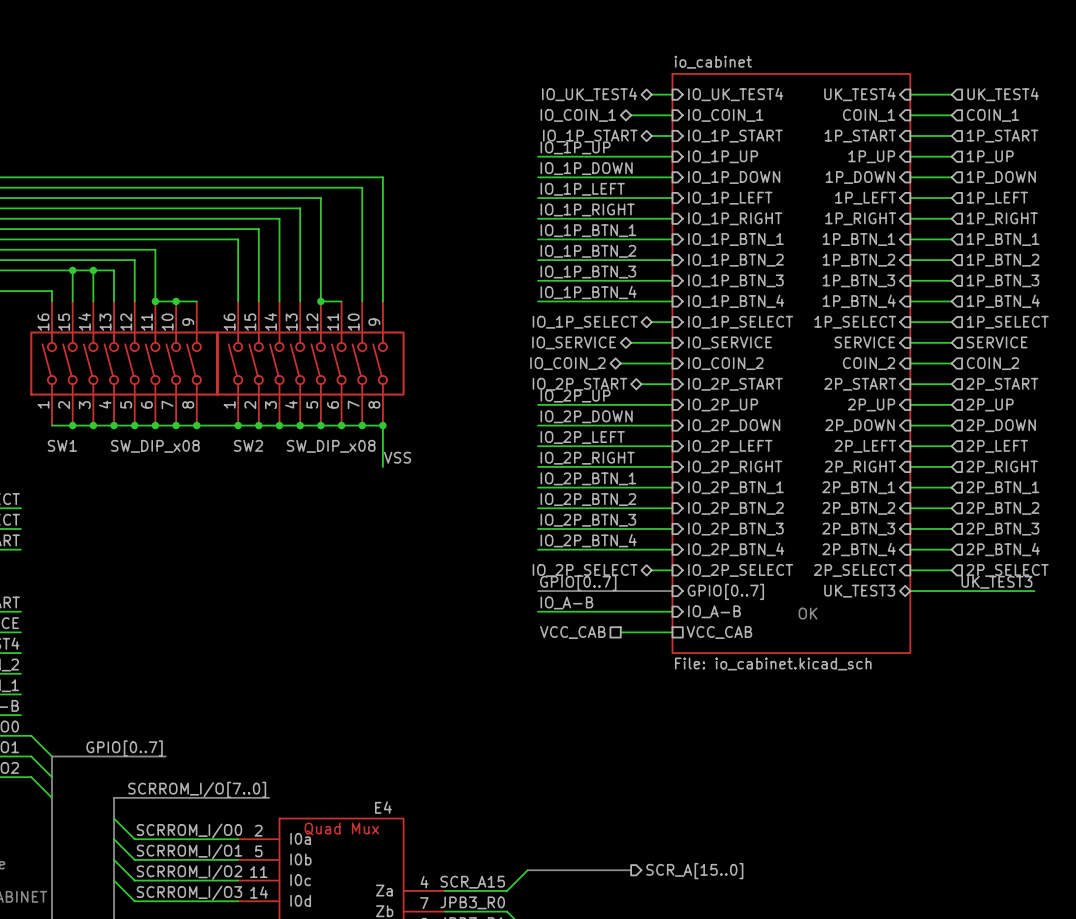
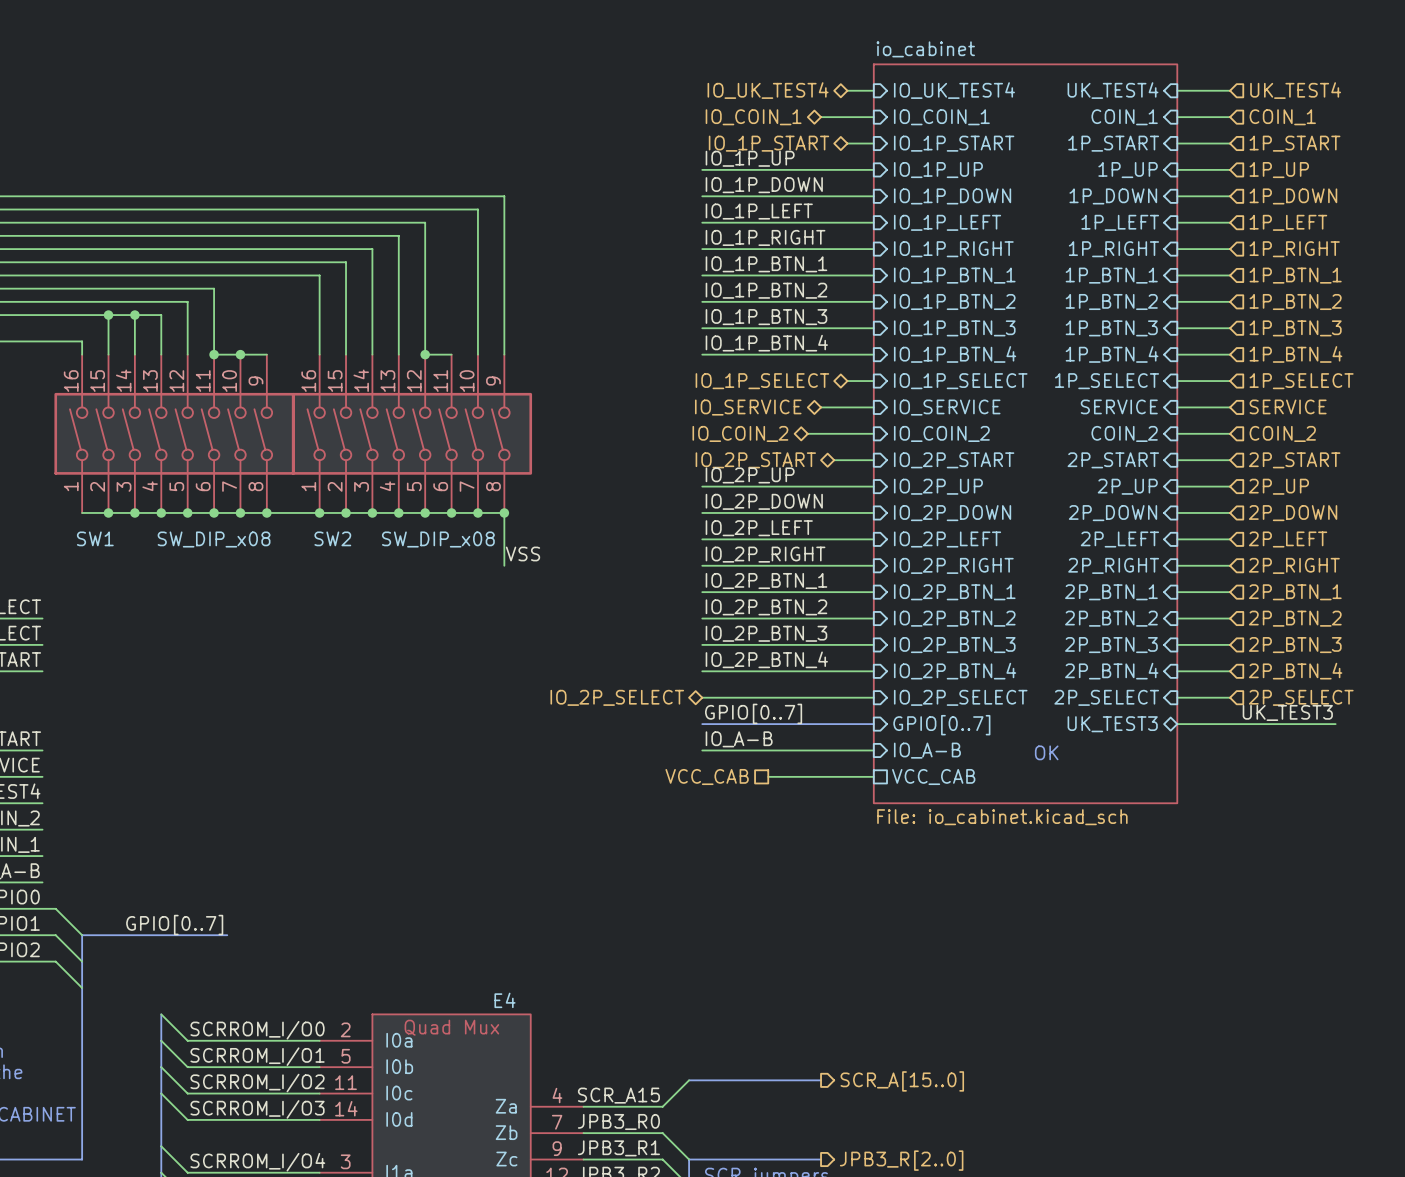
wire: none -> (702, 697) (847, 697)
hierarchical label position: IO_2P_SELECT (585, 570) -> IO_2P_SELECT (617, 697)
hierarchical label position: VCC_CAB (572, 632) -> VCC_CAB (707, 777)
wire: none -> (768, 776) (807, 776)
label: SCRROM_I/O[7..0] (197, 789) -> none
bus: (269, 797) (114, 797) (114, 818) -> none

